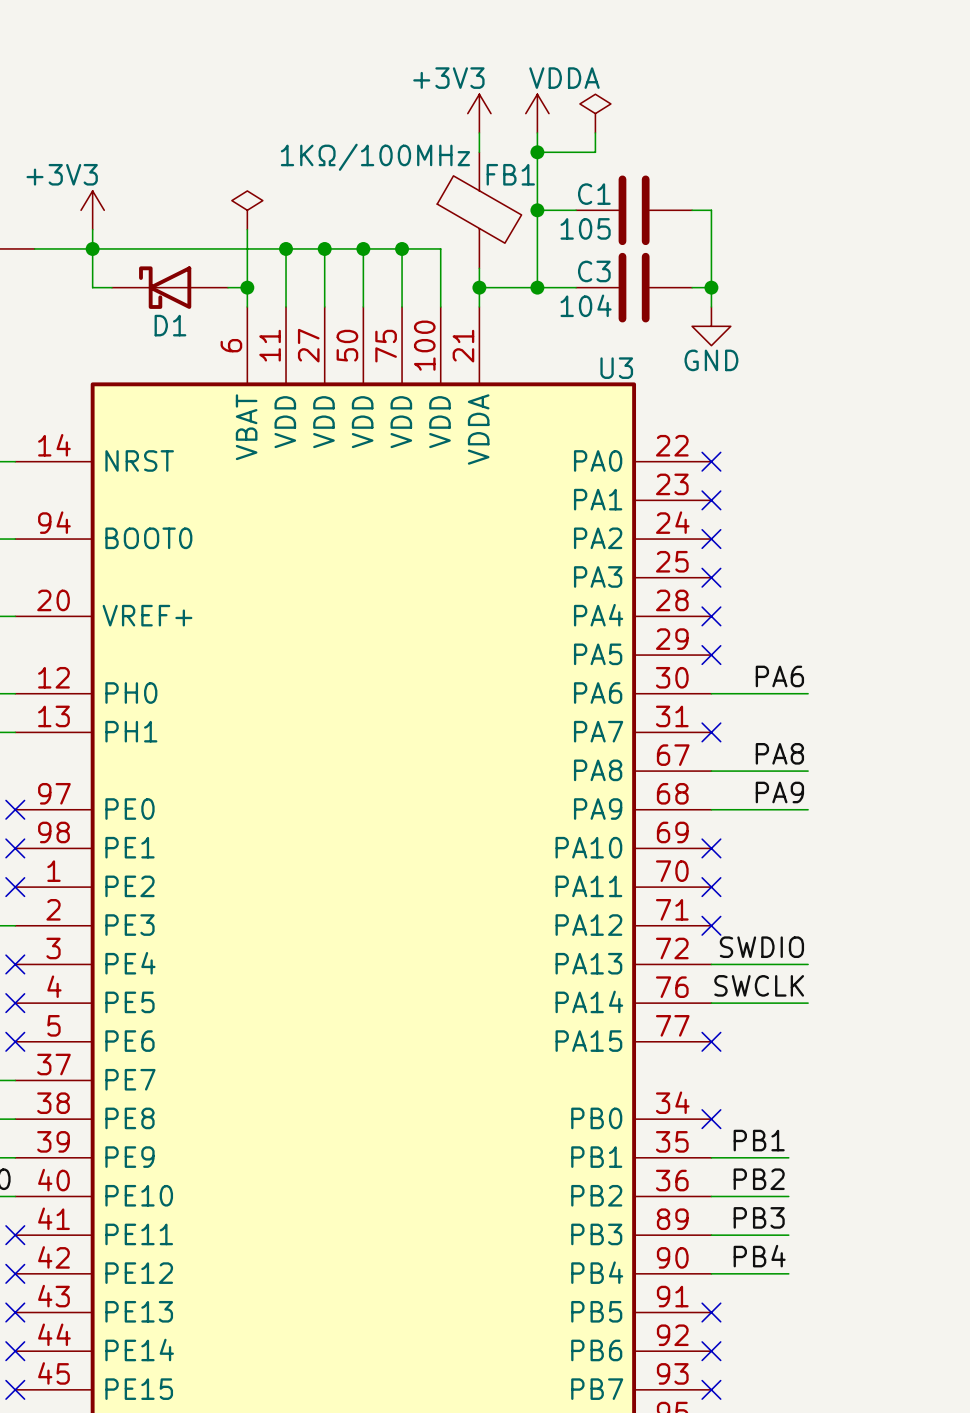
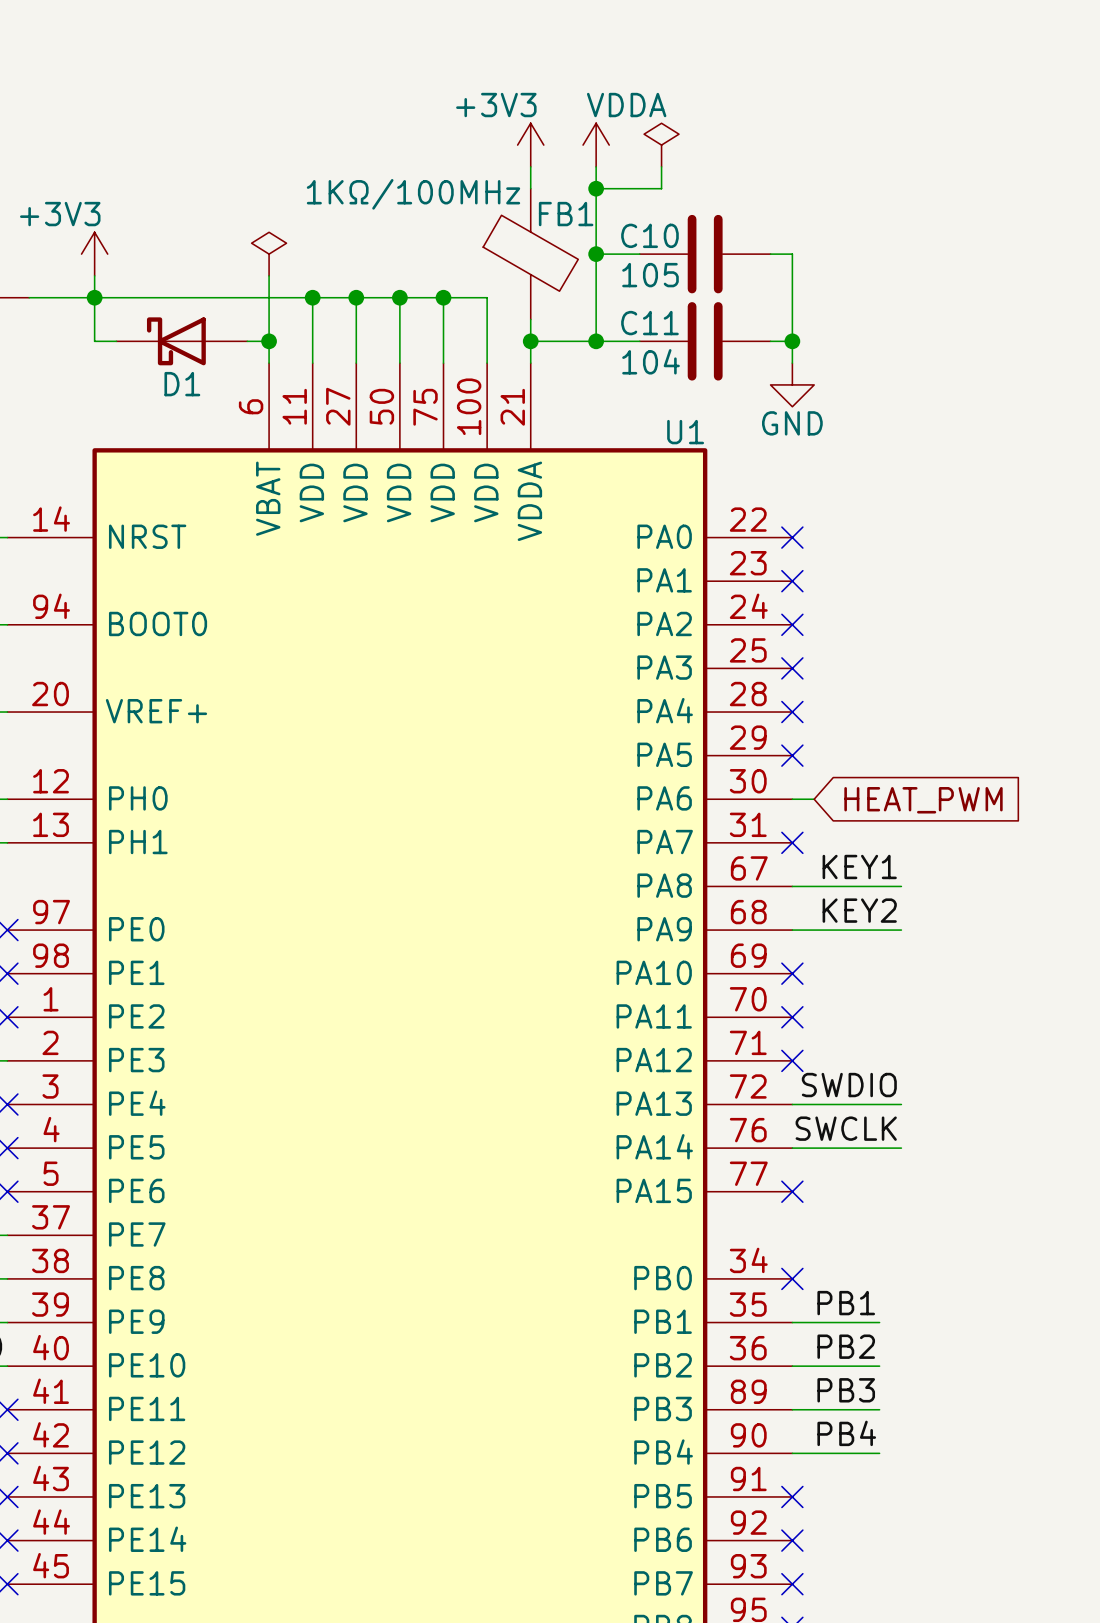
C1 name: C1 (594, 194) -> C10 (649, 235)
C3 name: C3 (594, 271) -> C11 (649, 323)
U3 name: U3 (616, 368) -> U1 (685, 432)
label: PA6 (779, 676) -> none
wire: (730, 693) (808, 693) -> none
global label: none -> HEAT_PWM (923, 800)
label: PA8 (779, 753) -> KEY1 (859, 866)
label: PA9 (779, 792) -> KEY2 (859, 910)

